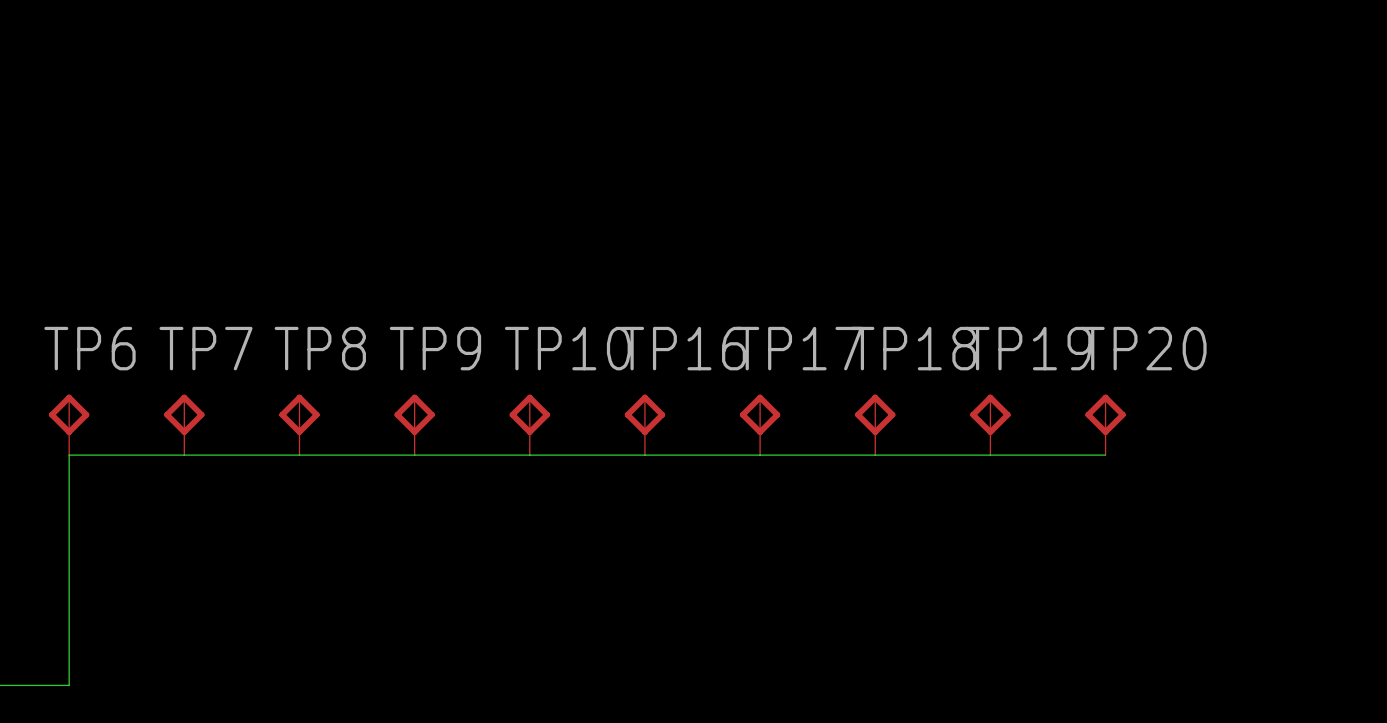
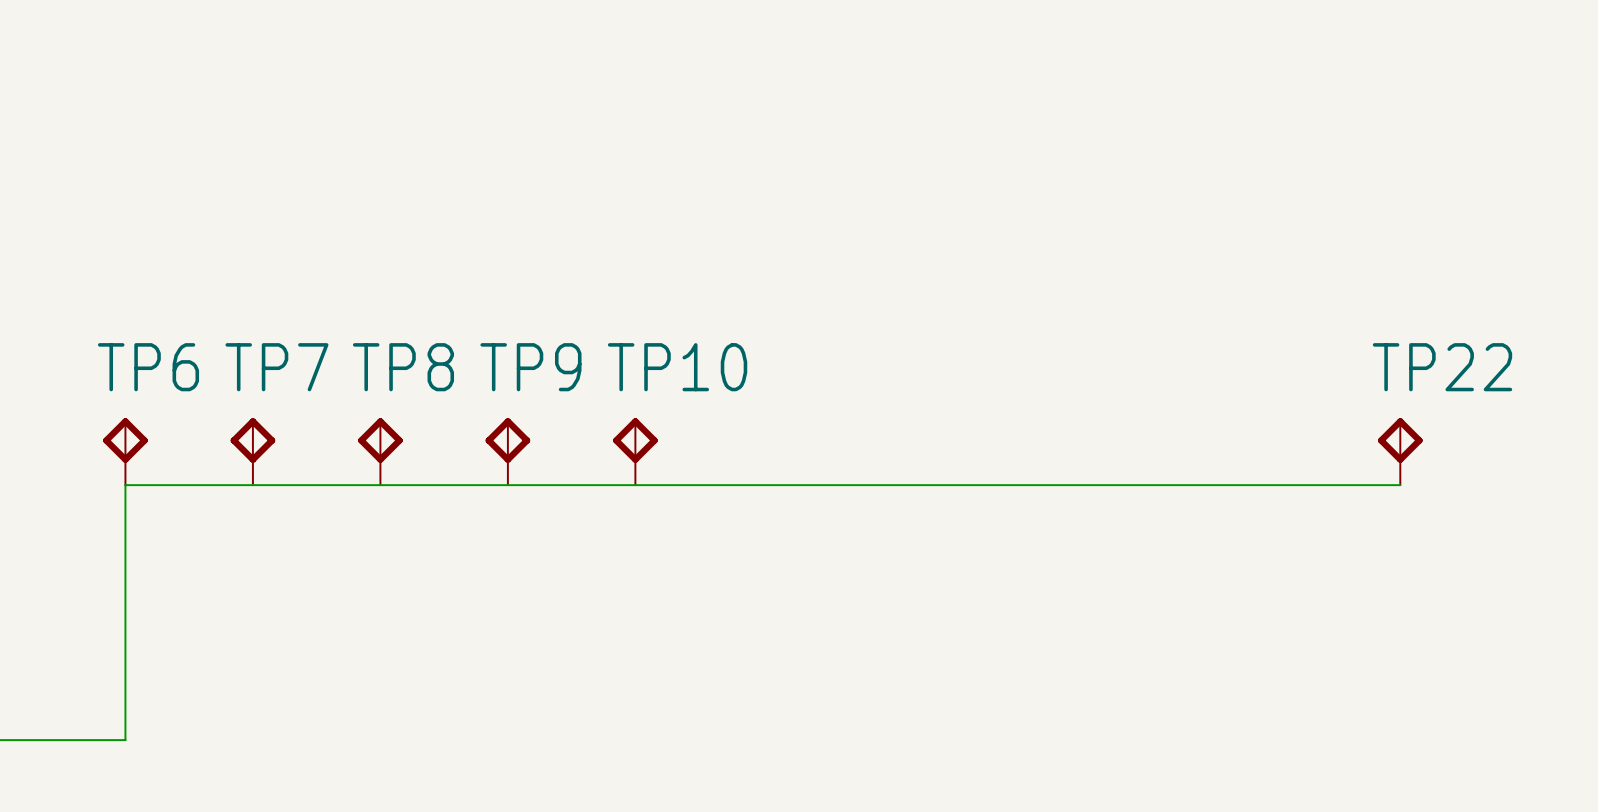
TP16: (644, 424) -> none
TP17: (760, 424) -> none
TP18: (875, 424) -> none
TP19: (990, 424) -> none
TP20: (1105, 424) -> none
TP22: none -> (1400, 451)
wire: none -> (1272, 485) (1400, 485)

